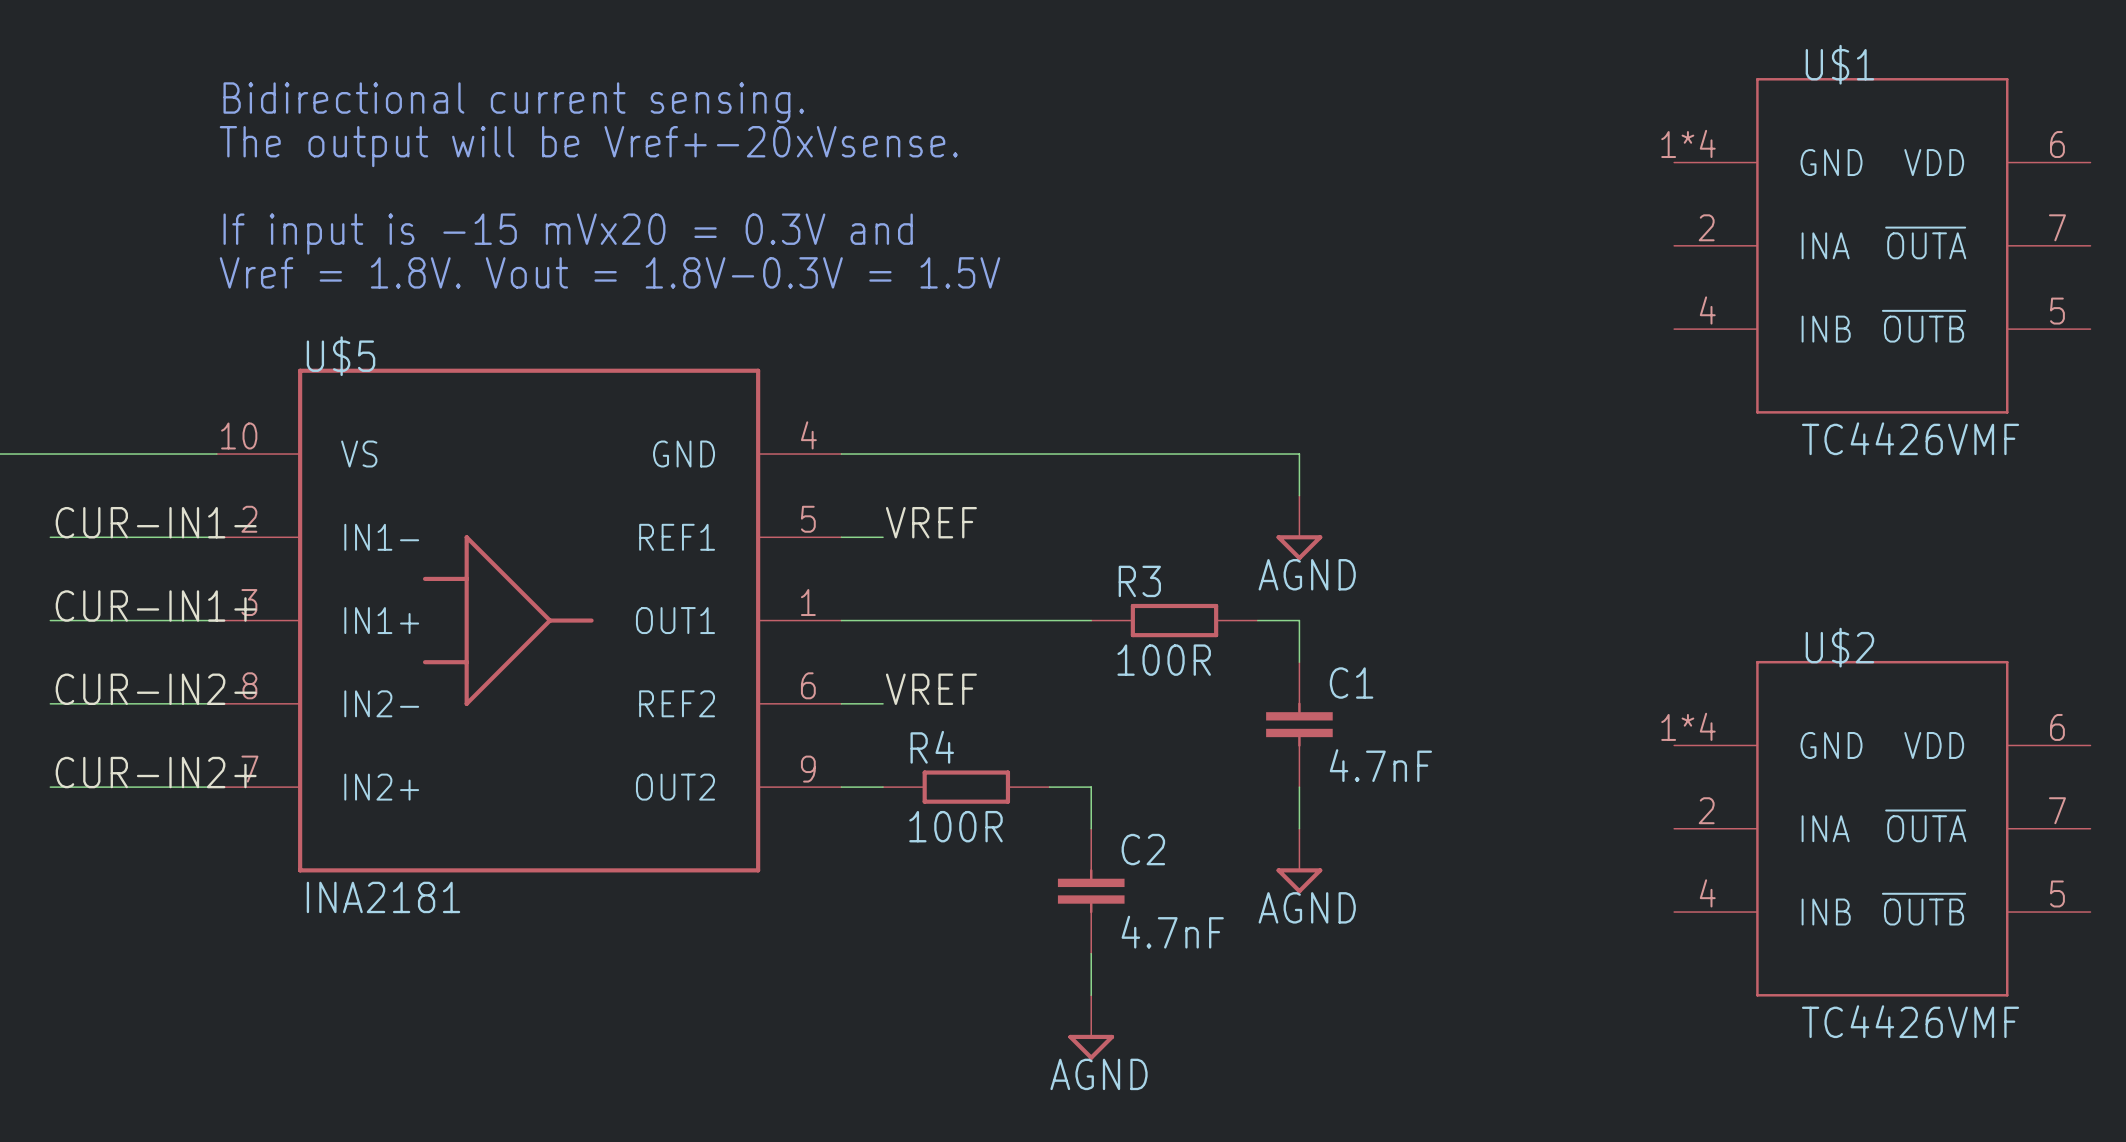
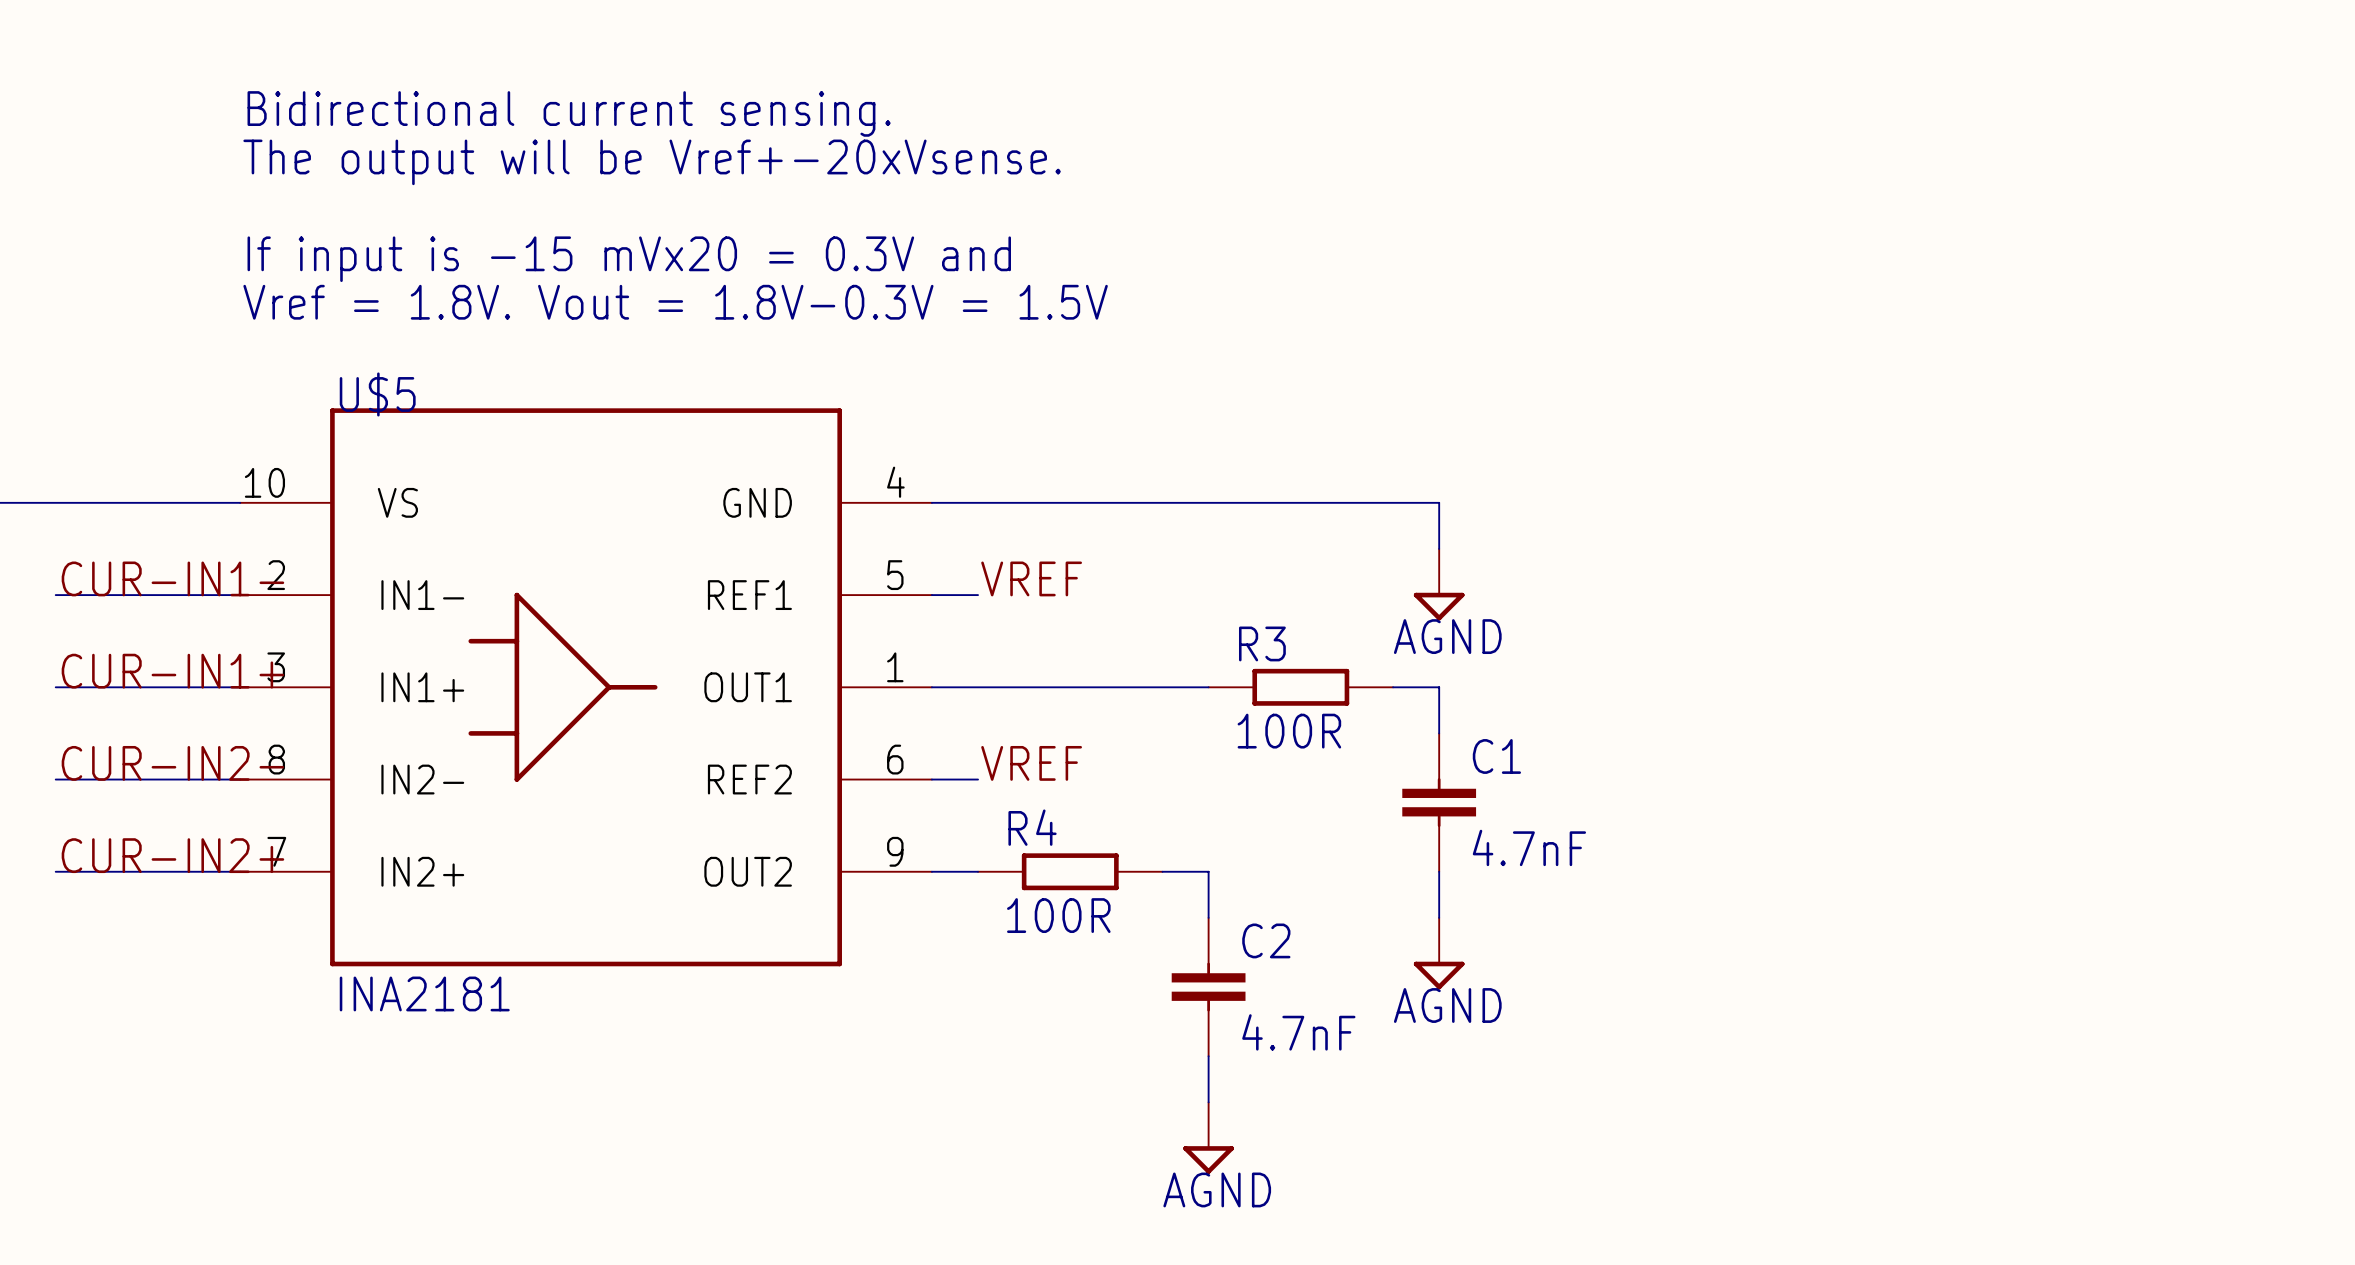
U$1: TC4426VMF (1882, 245) -> none
U$2: TC4426VMF (1882, 828) -> none

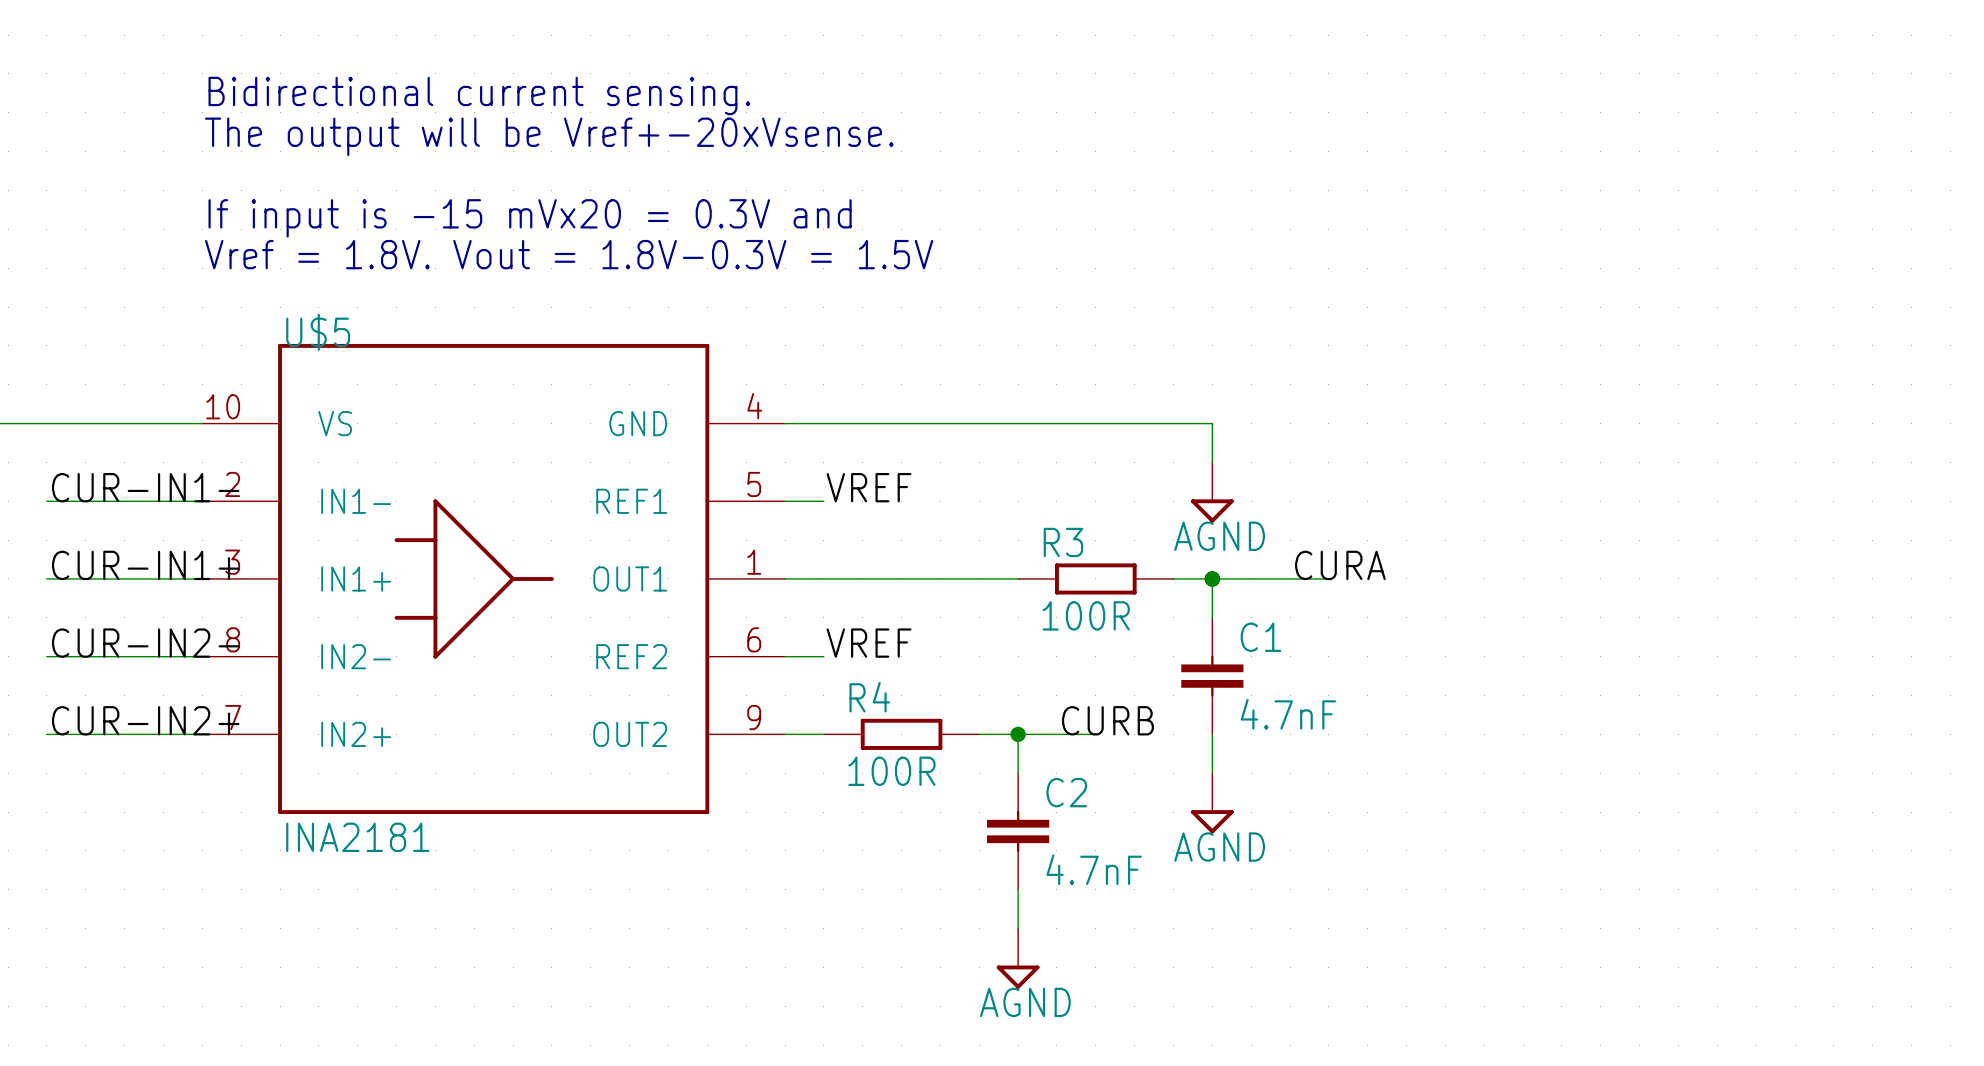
label: none -> CURA (1340, 565)
wire: none -> (1212, 578) (1328, 578)
junction: none -> (1212, 578)
label: none -> CURB (1107, 720)
wire: none -> (1018, 734) (1095, 734)
junction: none -> (1018, 734)

